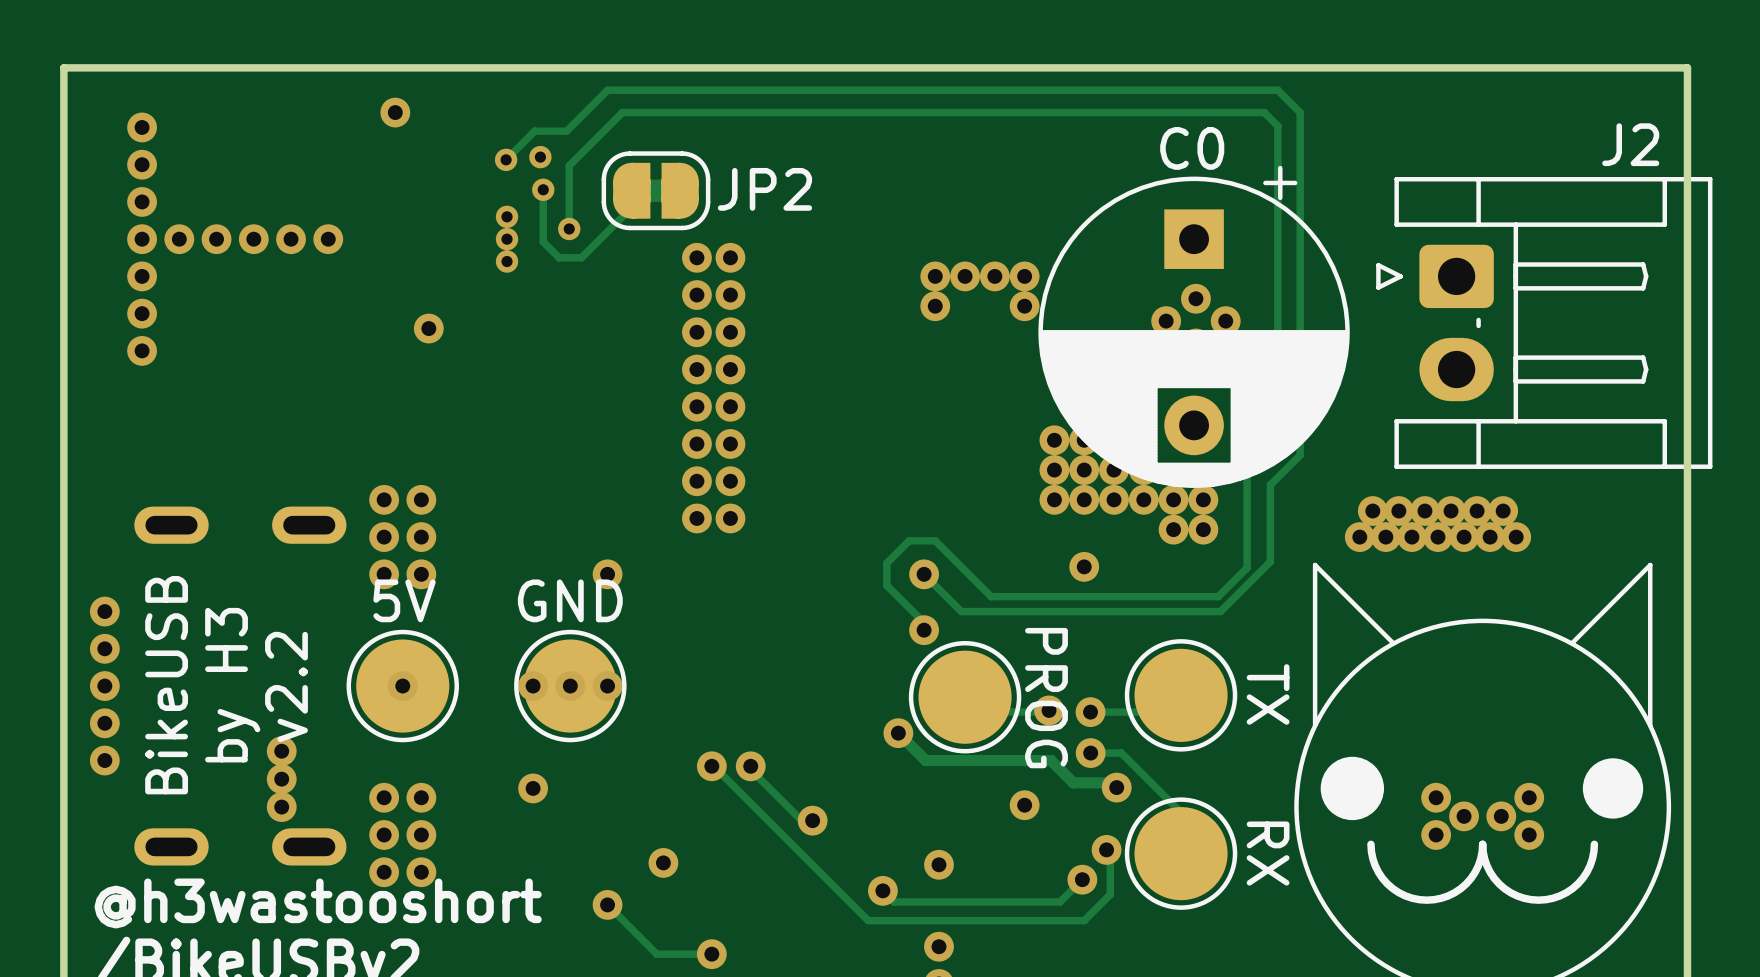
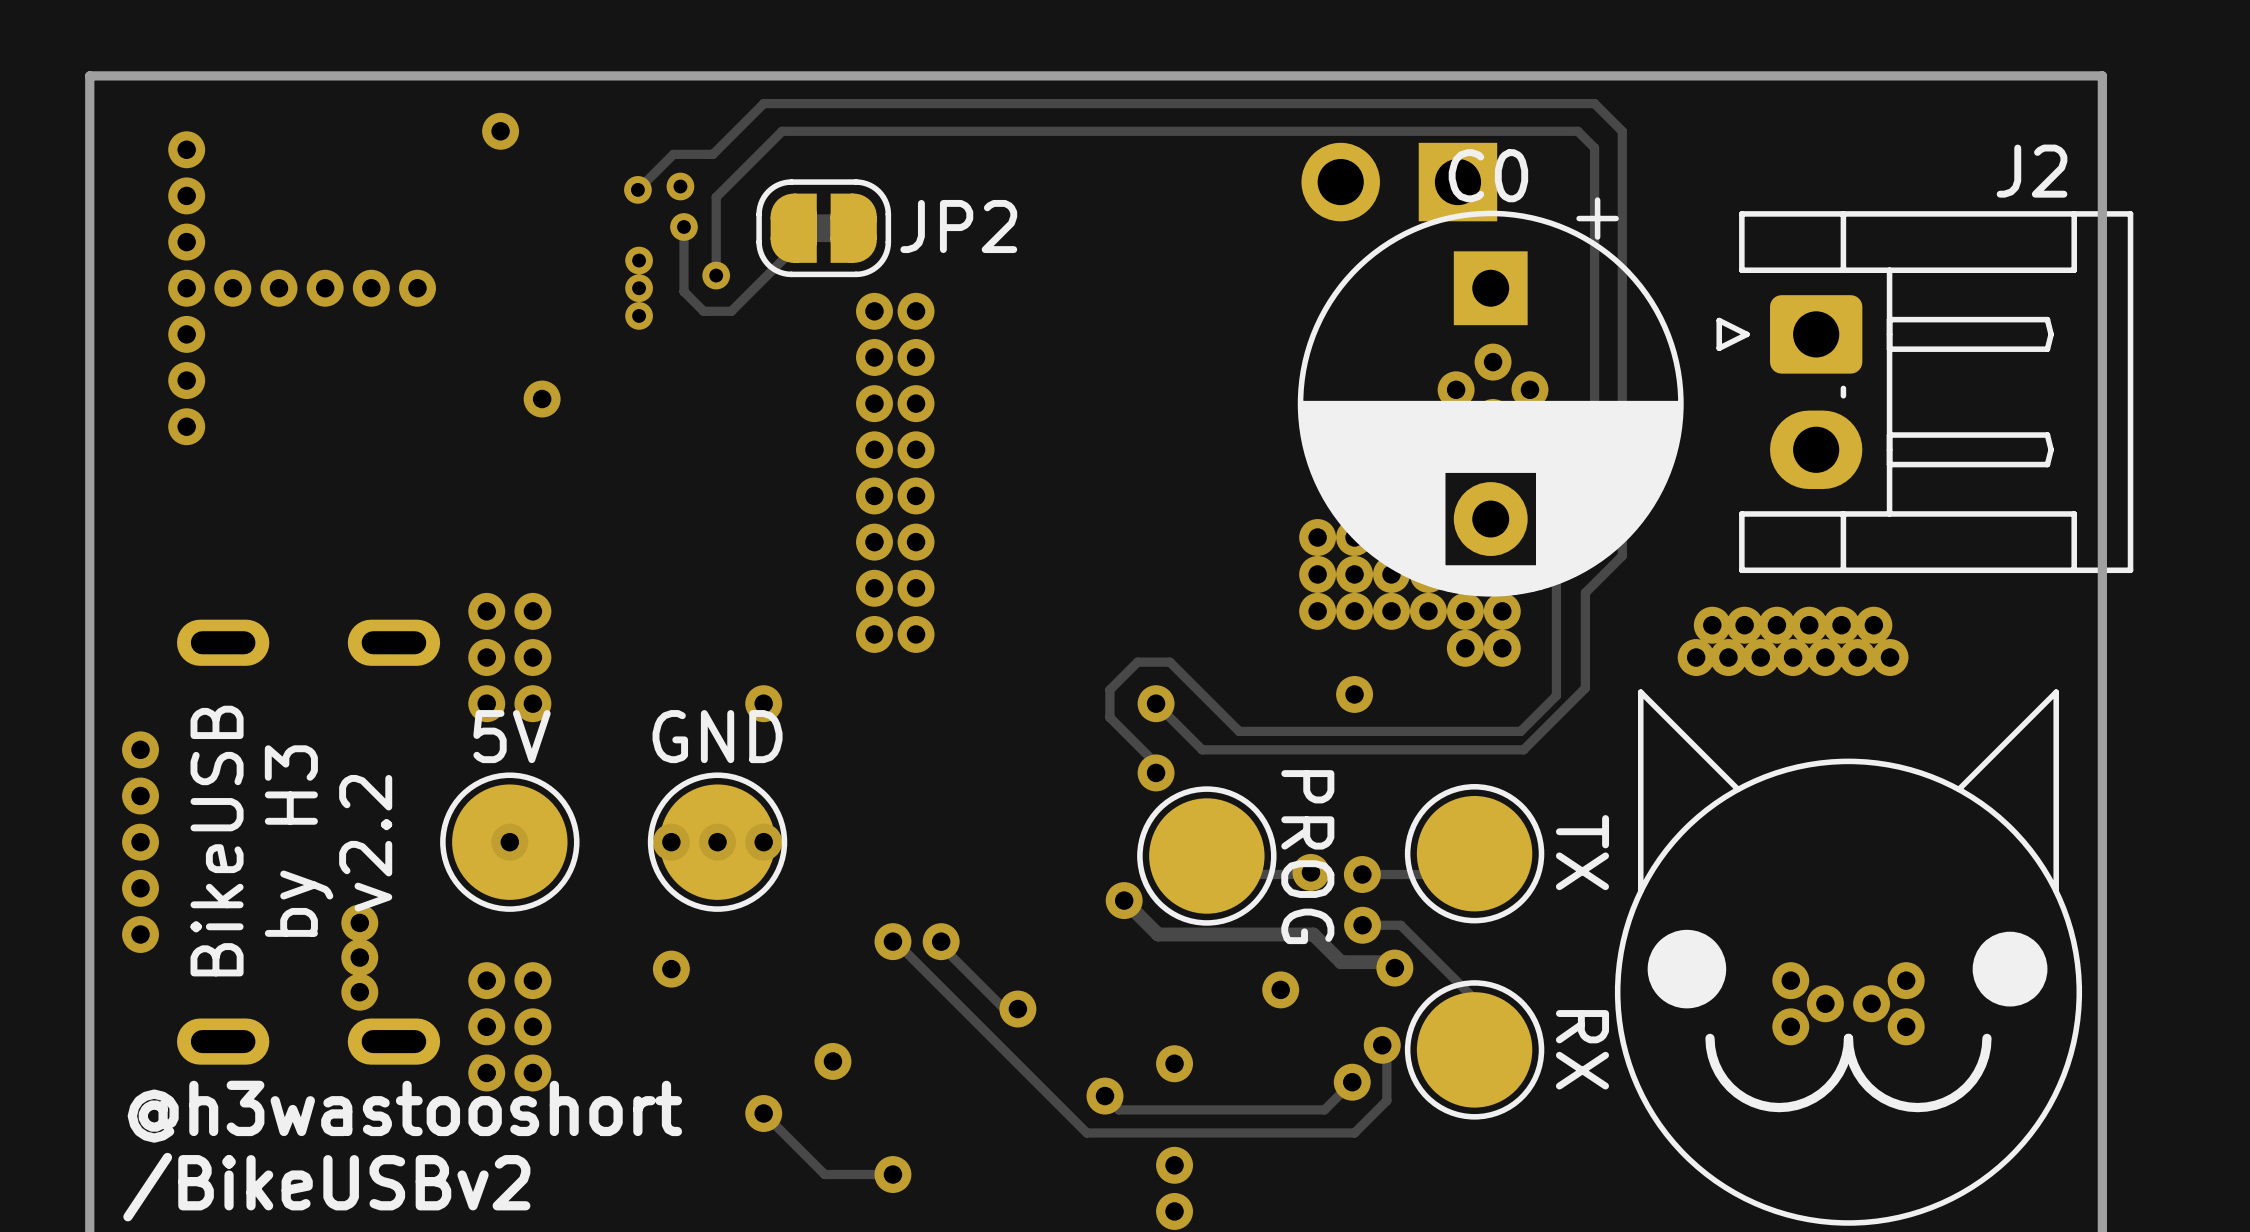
part: none -> (1399, 182)
via: (935, 276) -> none
via: (965, 276) -> none
via: (994, 276) -> none
via: (1024, 276) -> none
via: (935, 306) -> none
via: (1024, 306) -> none

